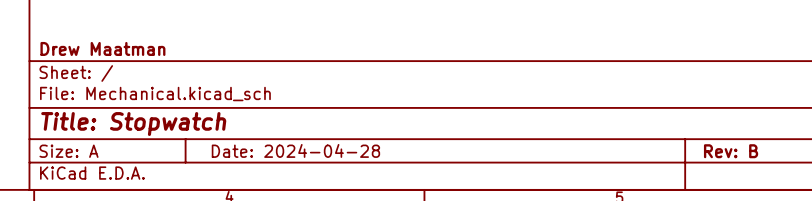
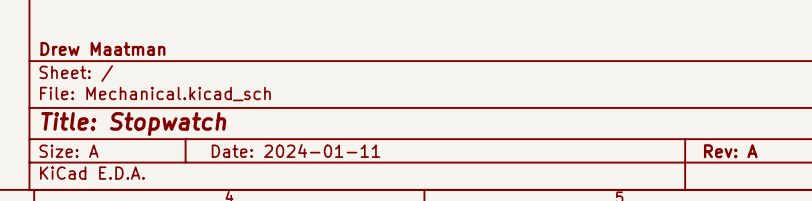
title block: Date: 2024-04-28 (295, 150) -> Date: 2024-01-11 (295, 150)
title block: Rev: B (731, 151) -> Rev: A (730, 151)

